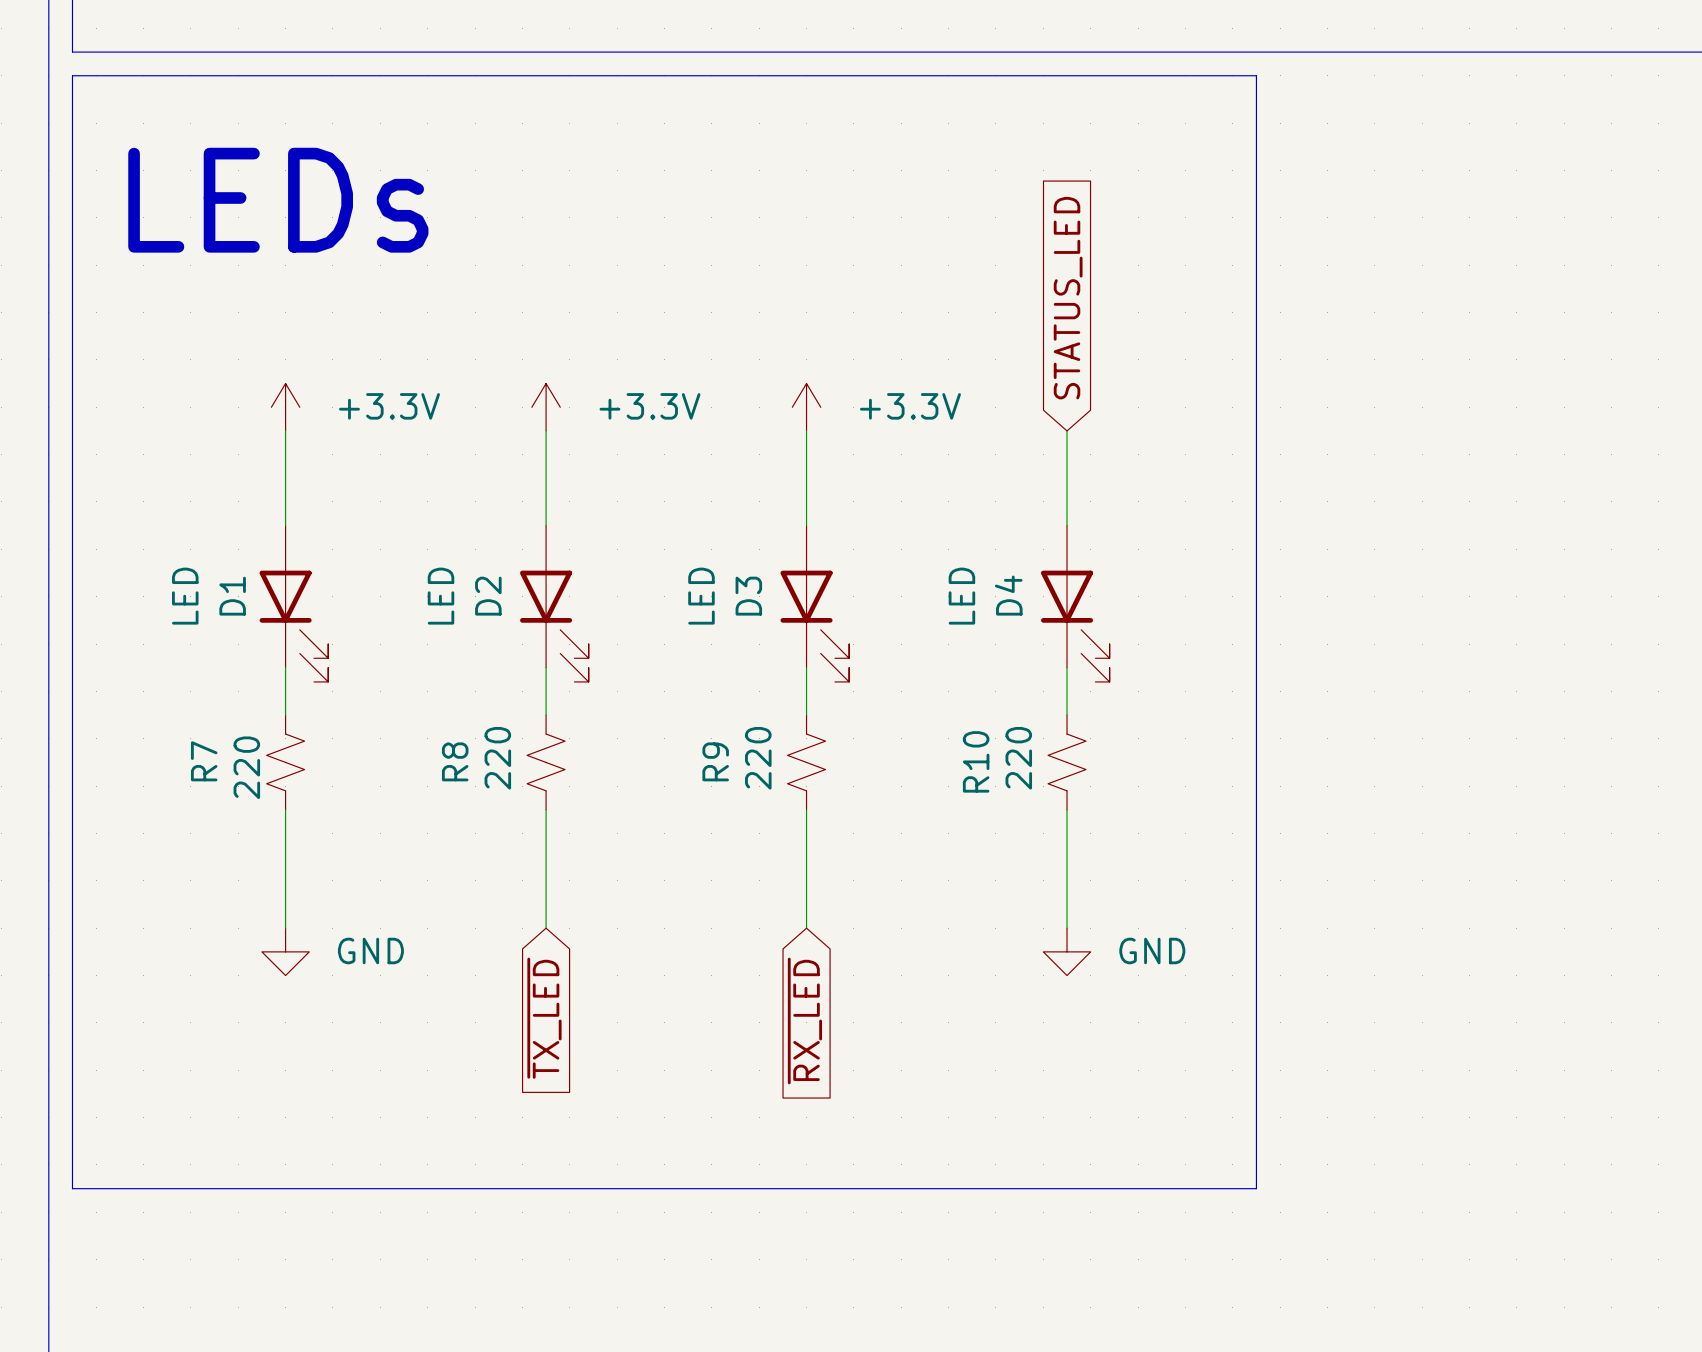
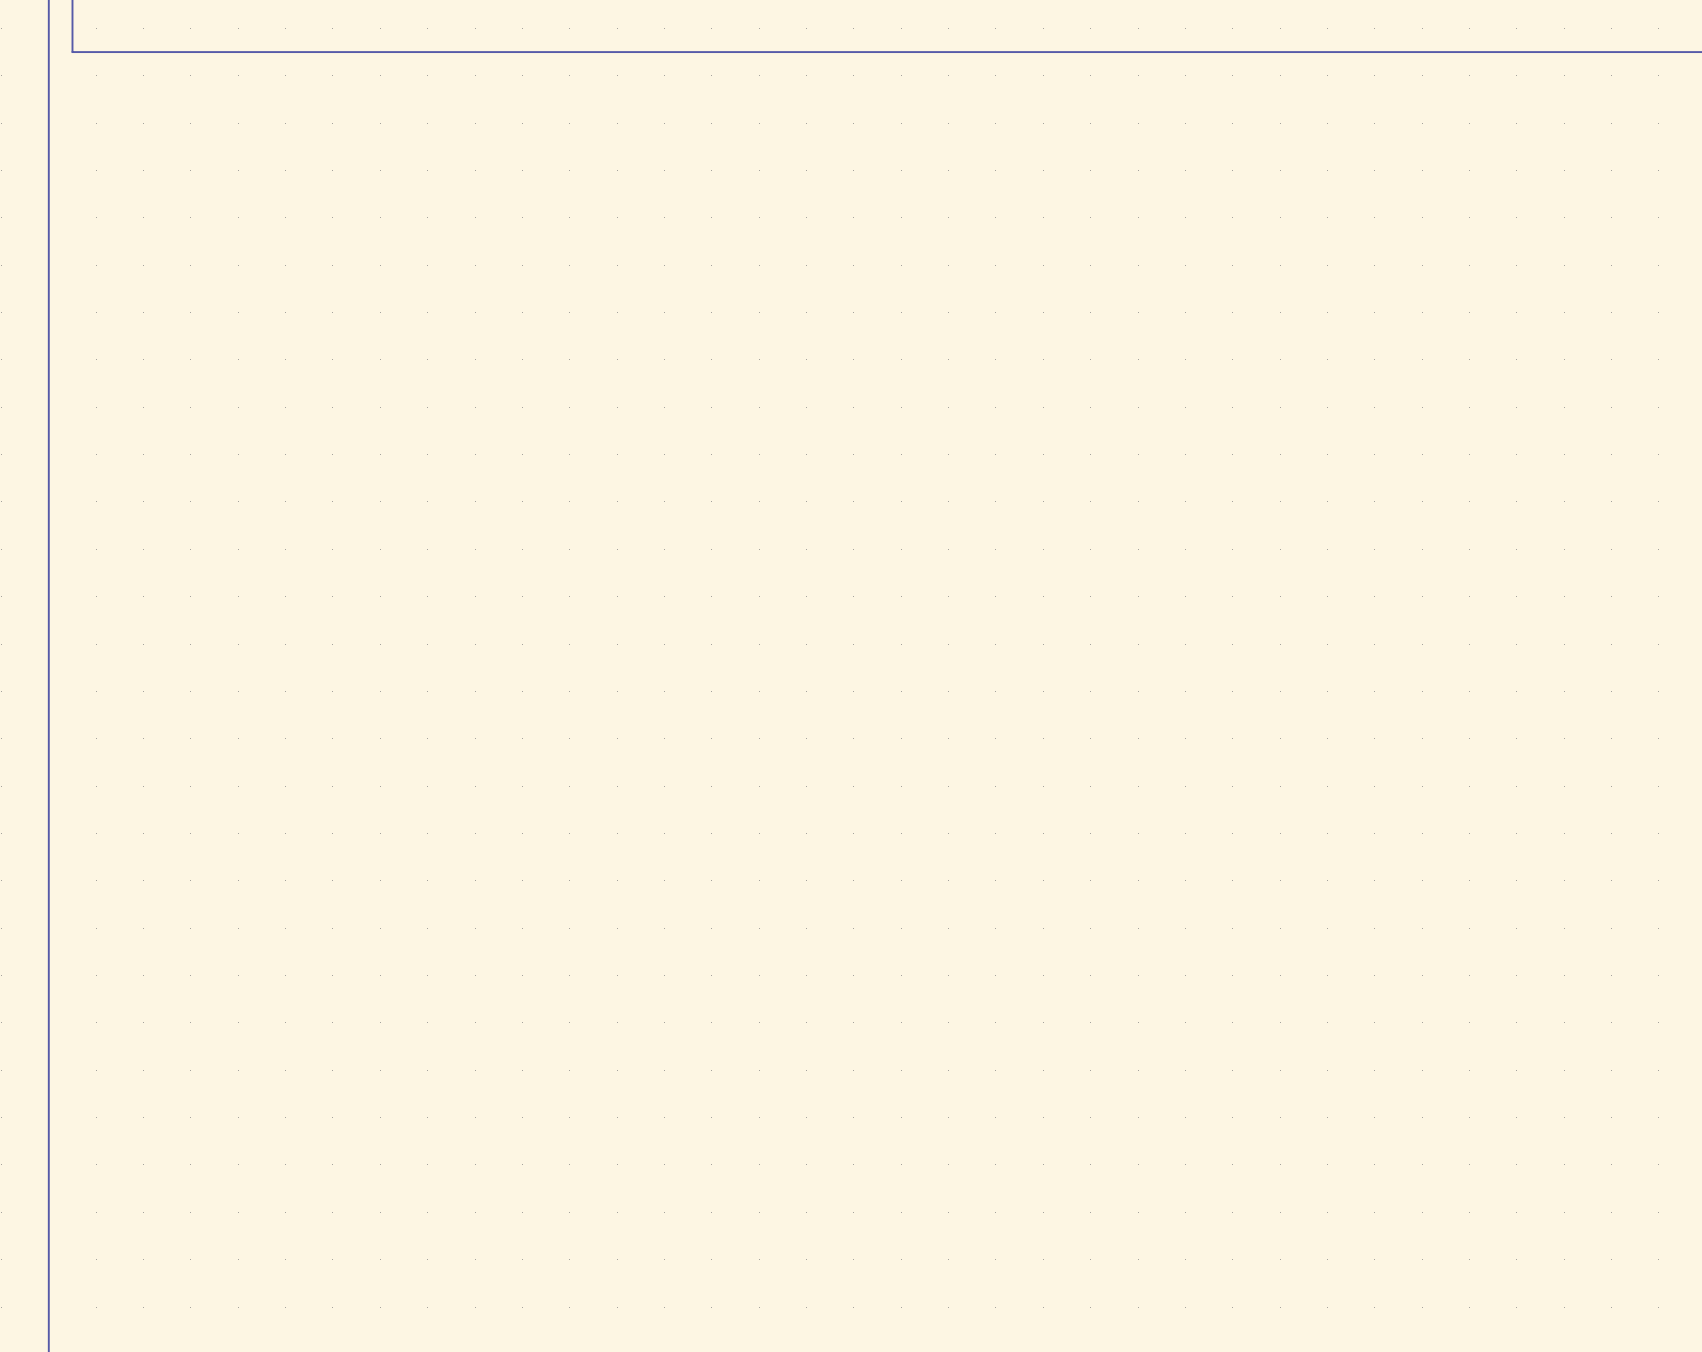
line: (72, 75) (1256, 75) (1256, 1188) (72, 1188) (72, 75) -> none
text: LEDs (278, 200) -> none
global label: STATUS_LED (1068, 298) -> none
power symbol: +3.3V (285, 407) -> none
power symbol: +3.3V (546, 407) -> none
power symbol: +3.3V (806, 407) -> none
wire: (285, 430) (285, 525) -> none
wire: (546, 430) (546, 525) -> none
wire: (806, 430) (806, 525) -> none
wire: (1067, 430) (1067, 525) -> none
D1: LED (293, 603) -> none
D2: LED (554, 603) -> none
D3: LED (814, 603) -> none
D4: LED (1075, 603) -> none
wire: (285, 667) (285, 715) -> none
wire: (546, 667) (546, 715) -> none
wire: (806, 667) (806, 715) -> none
wire: (1067, 667) (1067, 715) -> none
R7: 220 (285, 762) -> none
R8: 220 (546, 762) -> none
R9: 220 (806, 762) -> none
R10: 220 (1067, 762) -> none
wire: (285, 809) (285, 928) -> none
wire: (546, 809) (546, 928) -> none
wire: (806, 809) (806, 928) -> none
wire: (1067, 809) (1067, 928) -> none
power symbol: GND (285, 951) -> none
power symbol: GND (1067, 951) -> none
global label: ~{TX_LED} (544, 1018) -> none
global label: ~{RX_LED} (804, 1020) -> none

